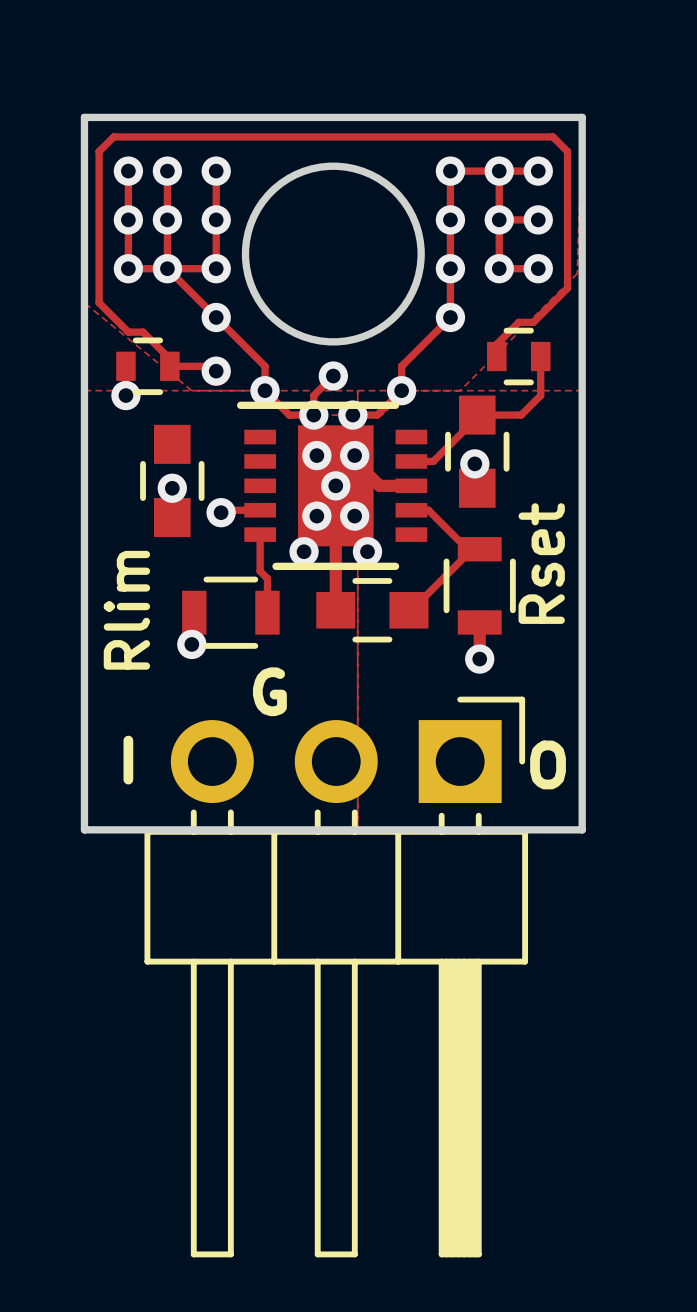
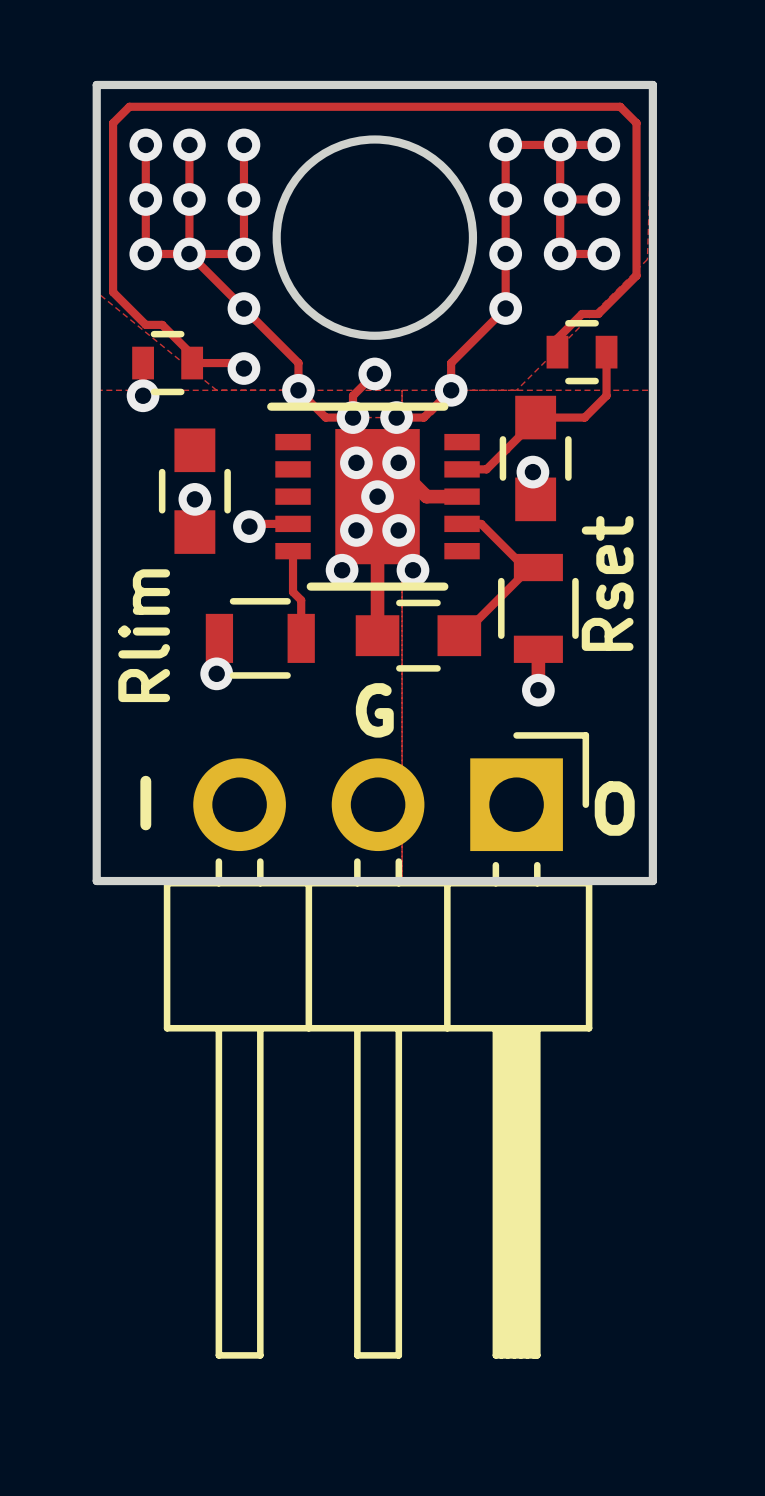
text position: G (269, 691) -> G (374, 710)

